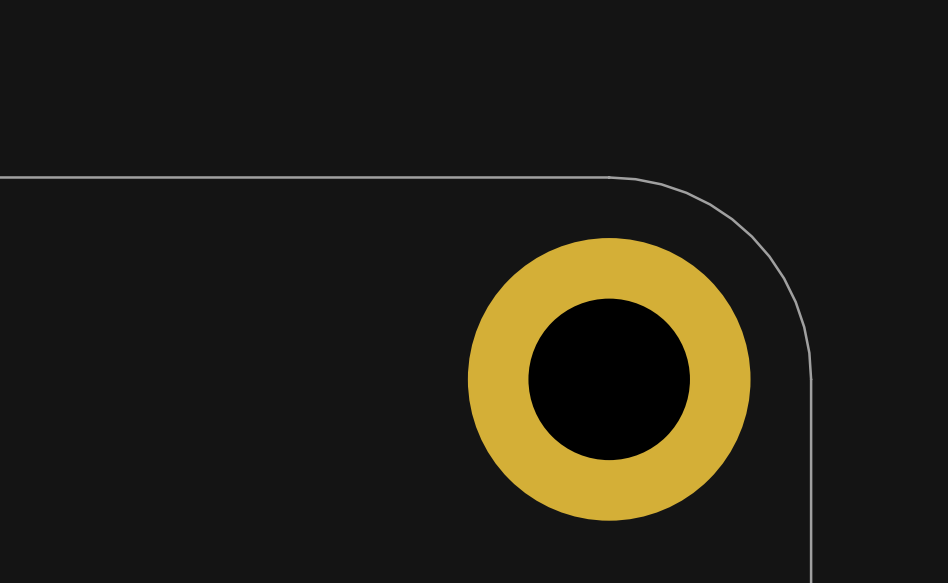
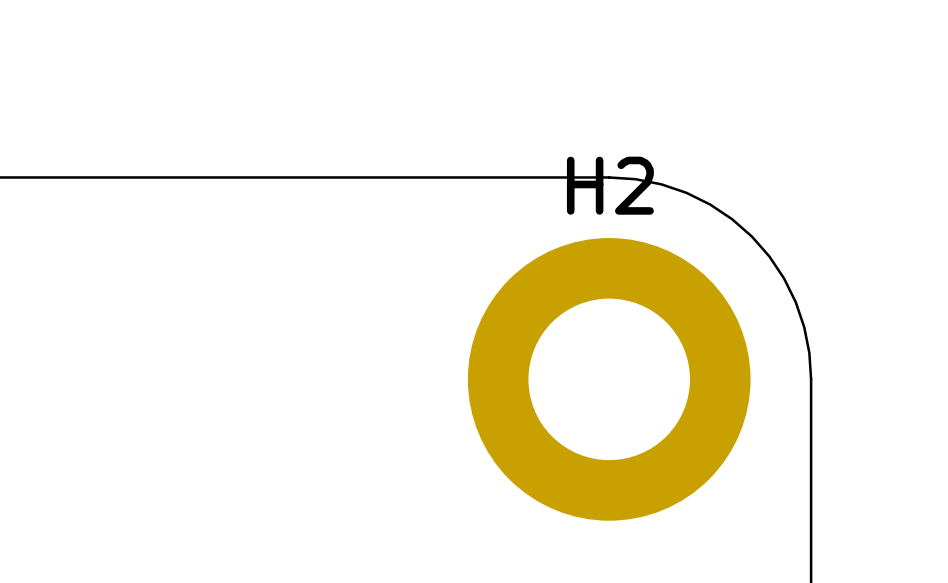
H2 name: none -> H2 (610, 185)

